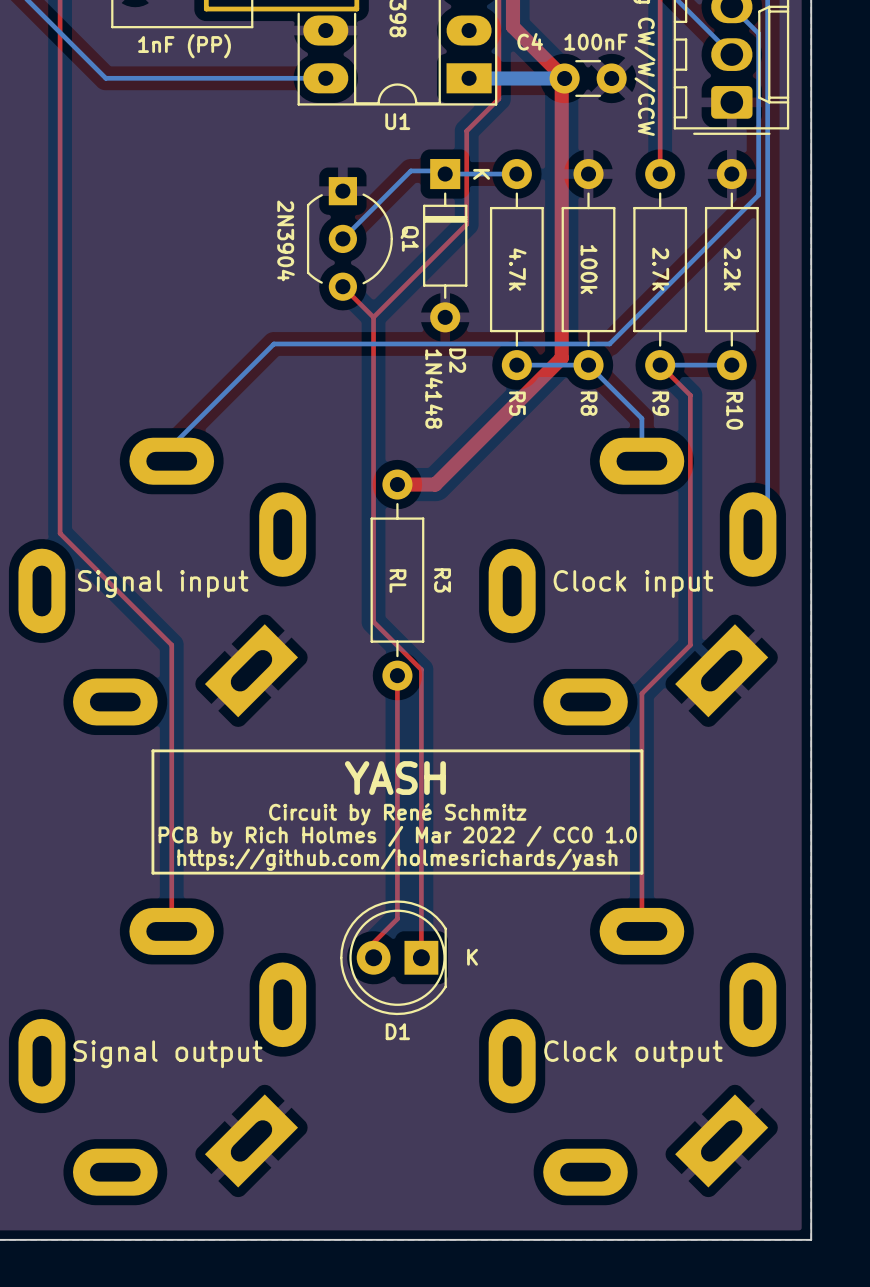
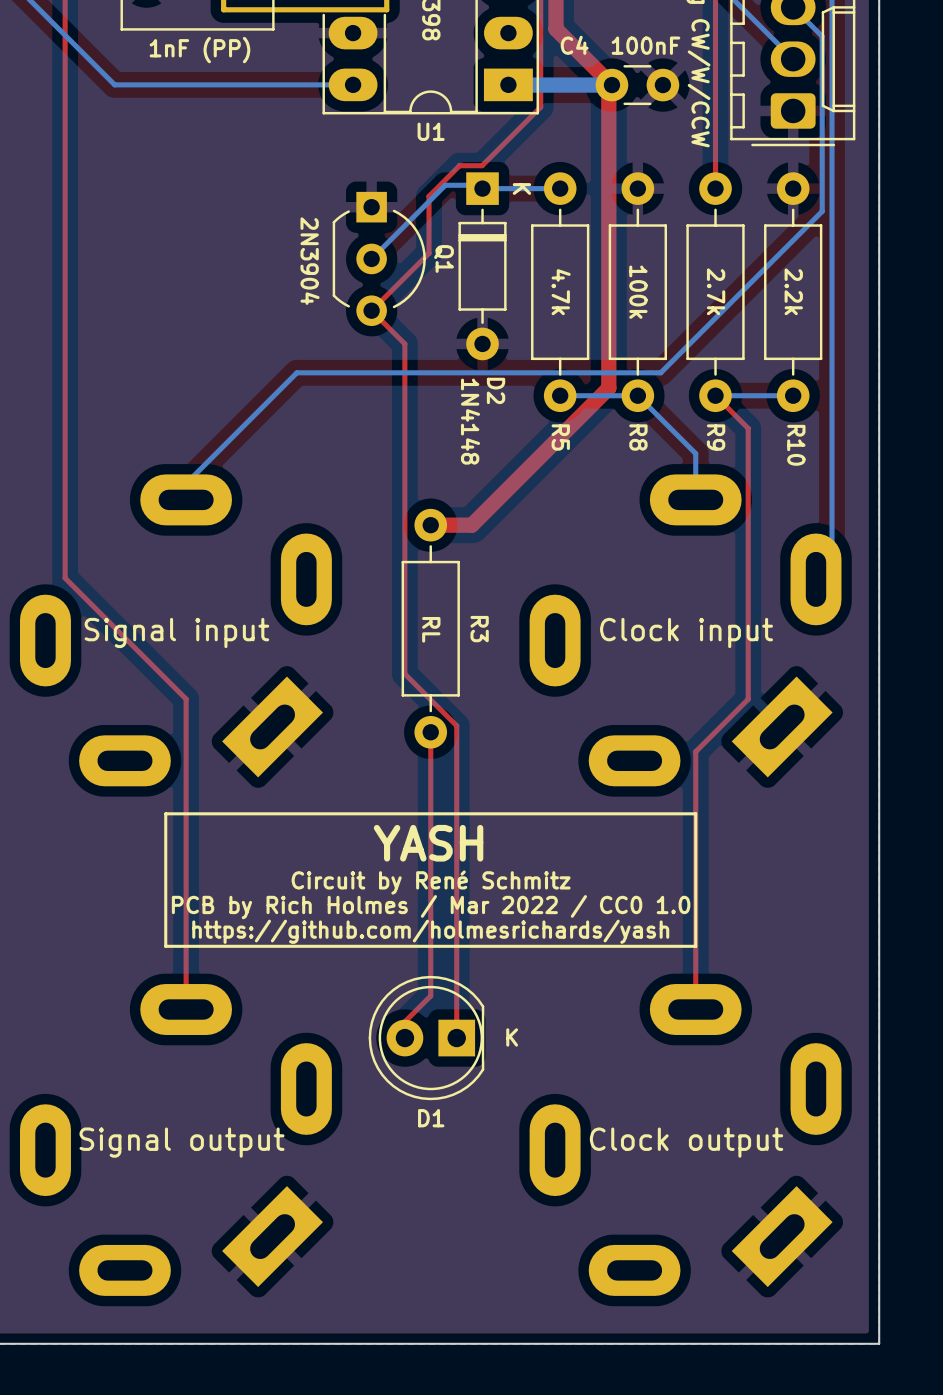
top track: (466, 131) (466, 224) (373, 317) -> (505, 142) (482, 165) (459, 165) (429, 196) (429, 253) (371, 310)

